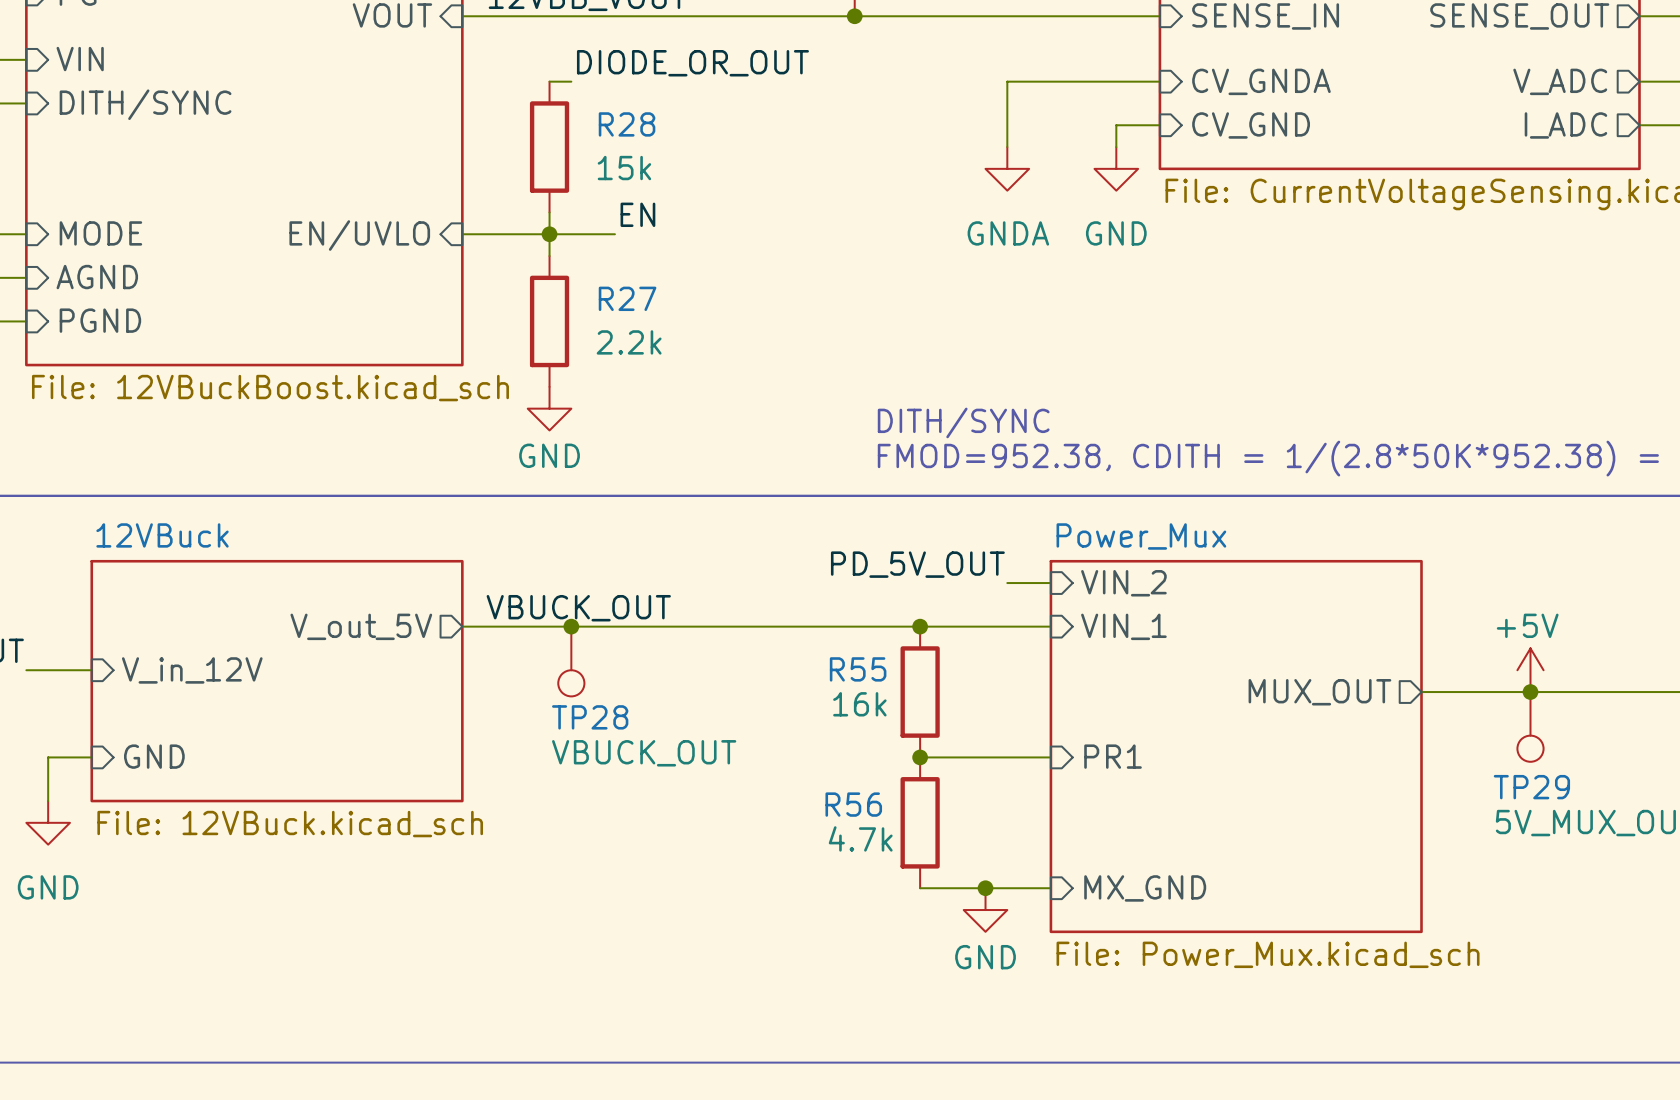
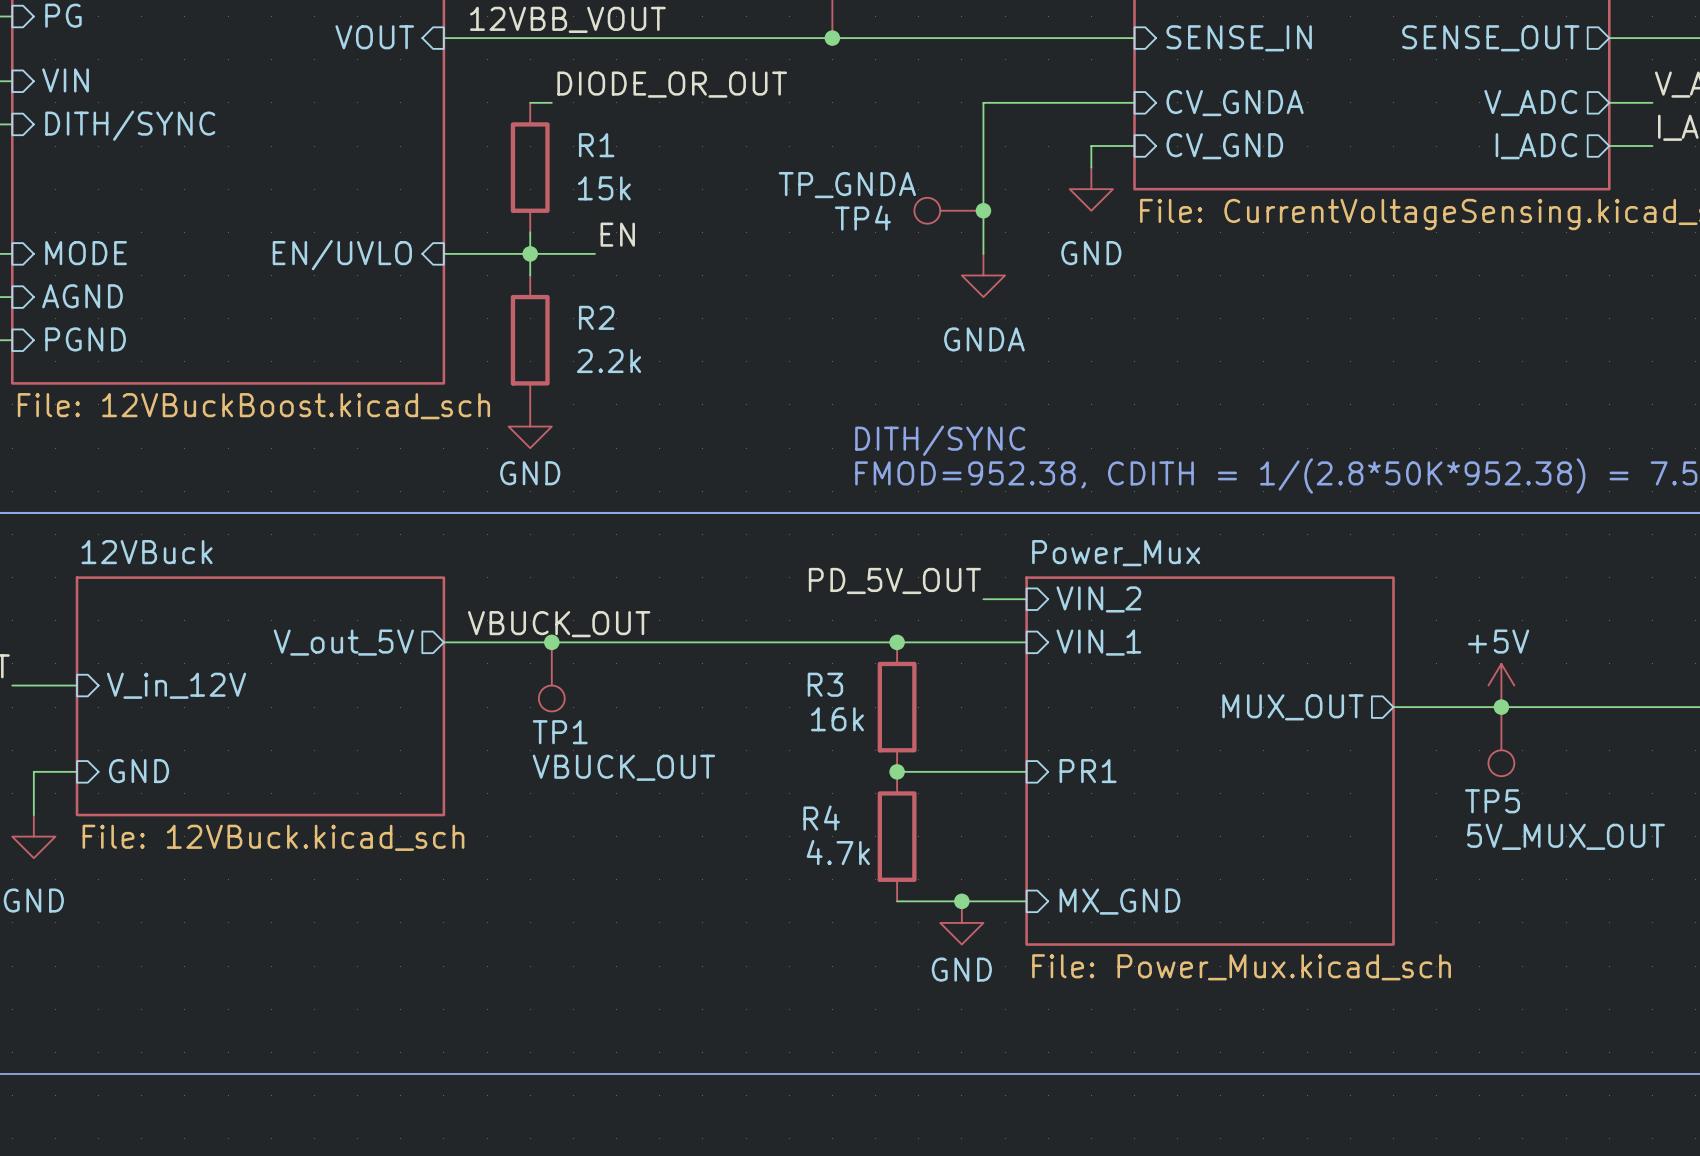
R28 name: R28 (627, 124) -> R1 (596, 145)
wire: none -> (983, 167) (983, 253)
power symbol position: GNDA (1007, 168) -> GNDA (983, 275)
TP4: none -> TP_GNDA (948, 210)
junction: none -> (983, 210)
R27 name: R27 (627, 298) -> R2 (596, 317)
R55 name: R55 (858, 669) -> R3 (825, 684)
TP28 name: TP28 (590, 717) -> TP1 (560, 732)
TP29 name: TP29 (1531, 787) -> TP5 (1492, 801)
R56 name: R56 (853, 804) -> R4 (821, 818)

